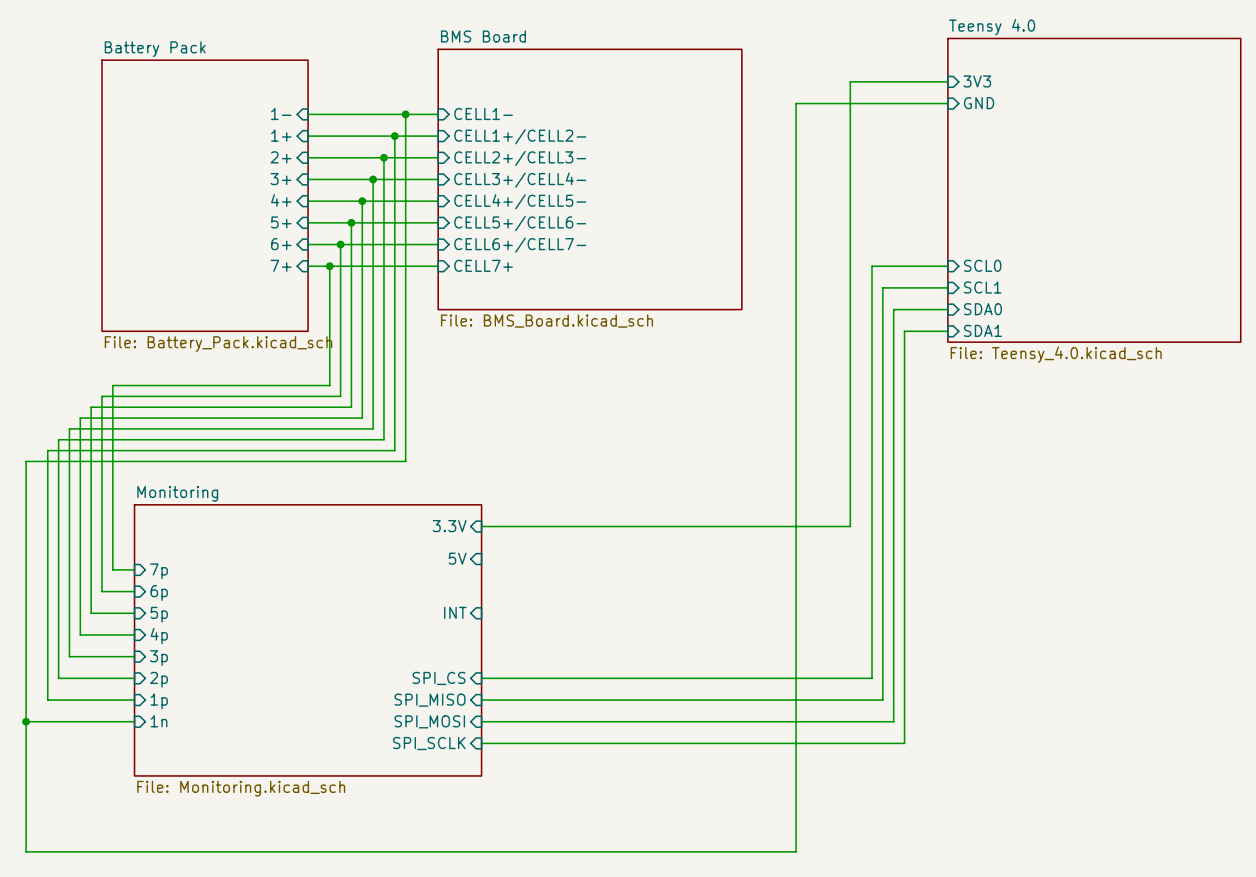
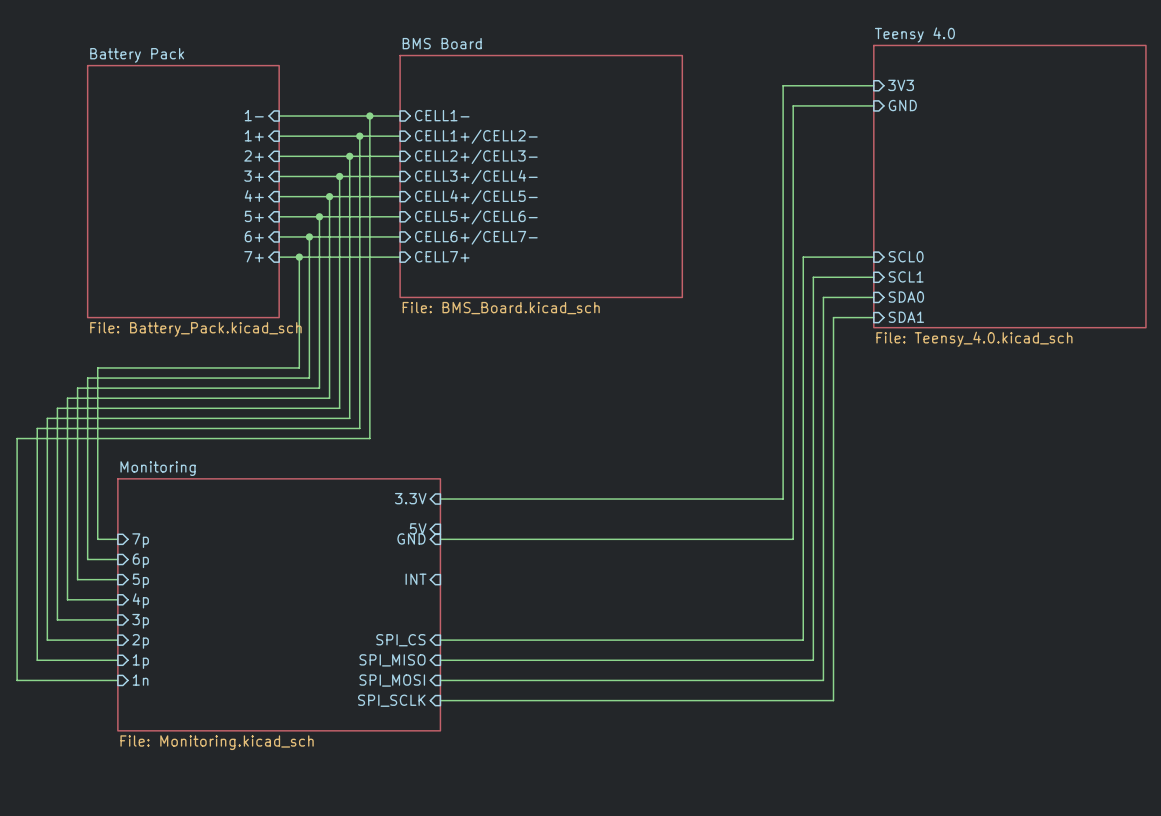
wire: (861, 103) (796, 103) (796, 851) (26, 851) (26, 721) -> (793, 105) (793, 539) (440, 539)
sheet pin: none -> GND (411, 538)
junction: (26, 721) -> none

